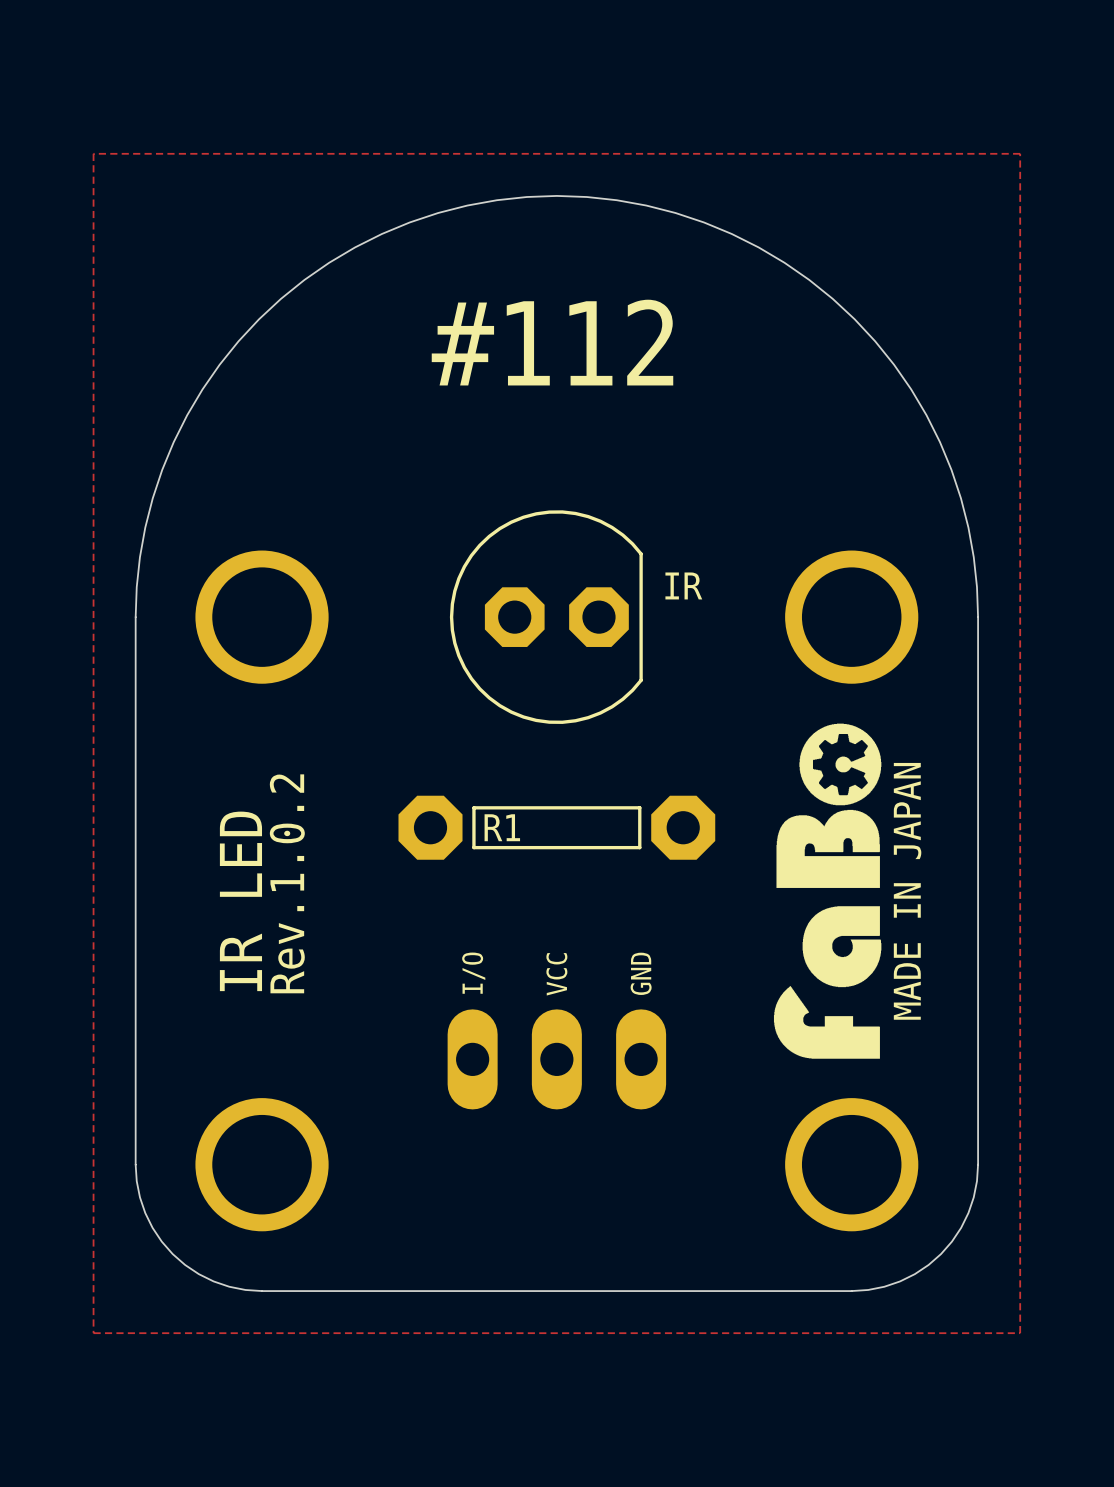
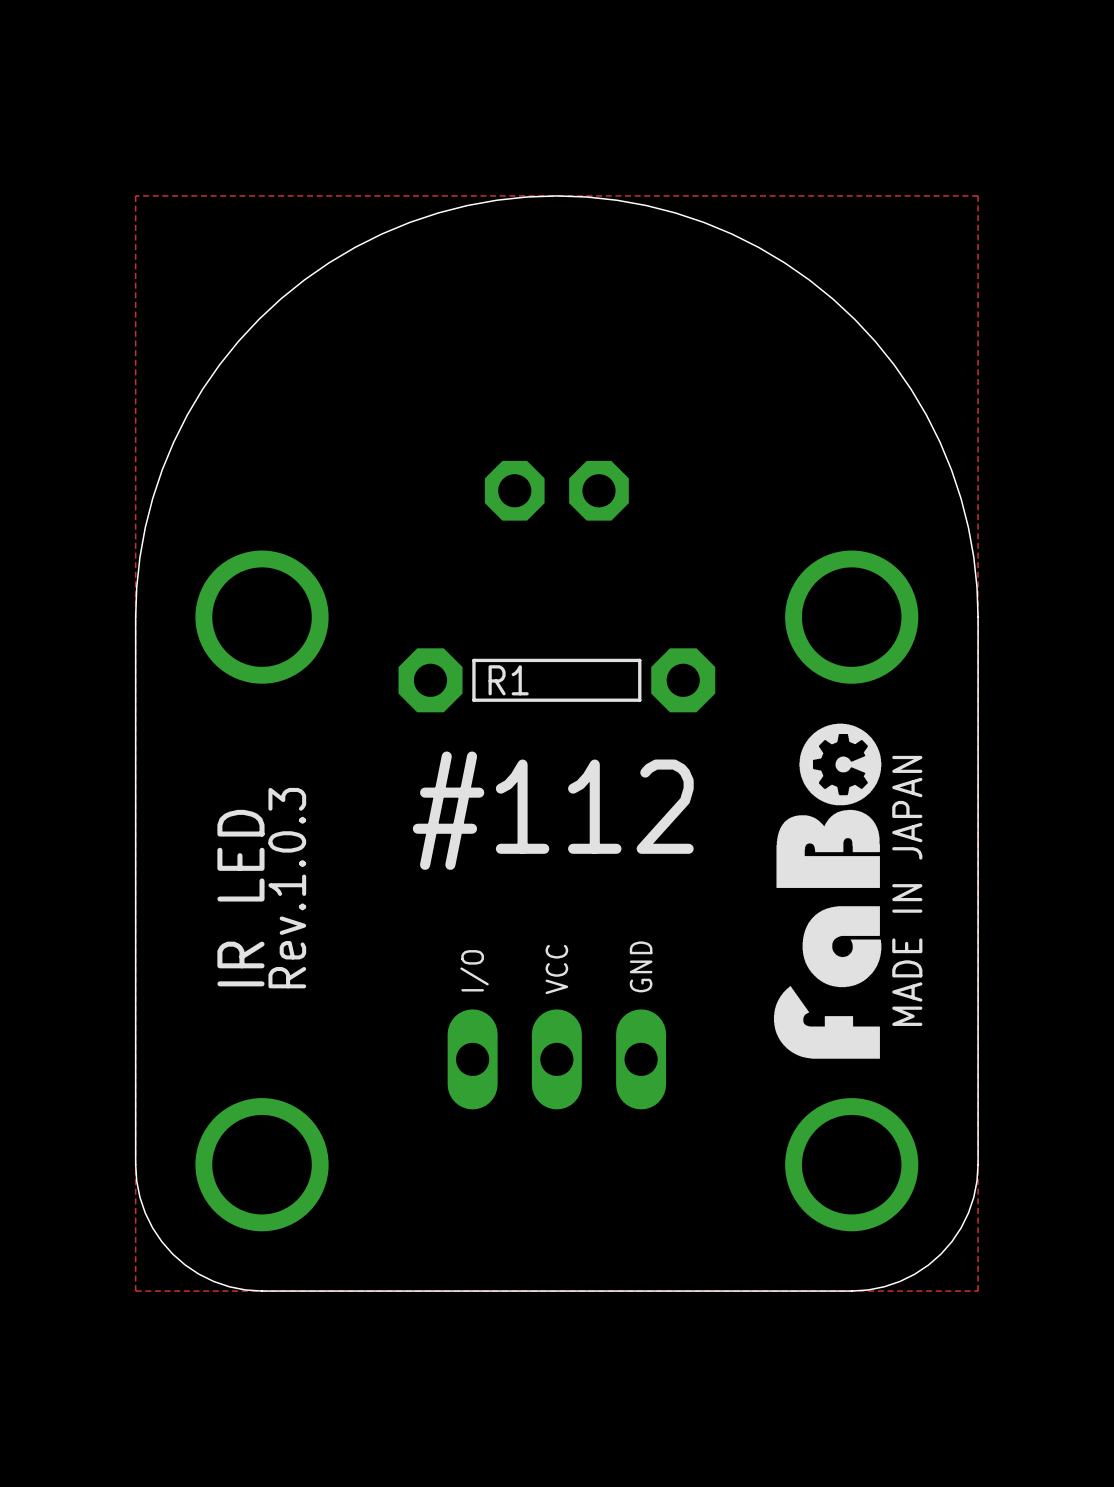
zone outline: (93, 153) (1020, 153) (1020, 1333) (93, 1333) (93, 153) -> (135, 195) (135, 1291) (978, 1291) (978, 195) (135, 195)
text position: #112 (552, 342) -> #112 (553, 810)
part: none -> (556, 490)
IR: (546, 617) -> none
R1 position: (556, 827) -> (556, 680)
text: Rev.1.0.2 (287, 883) -> Rev.1.0.3 (287, 888)

